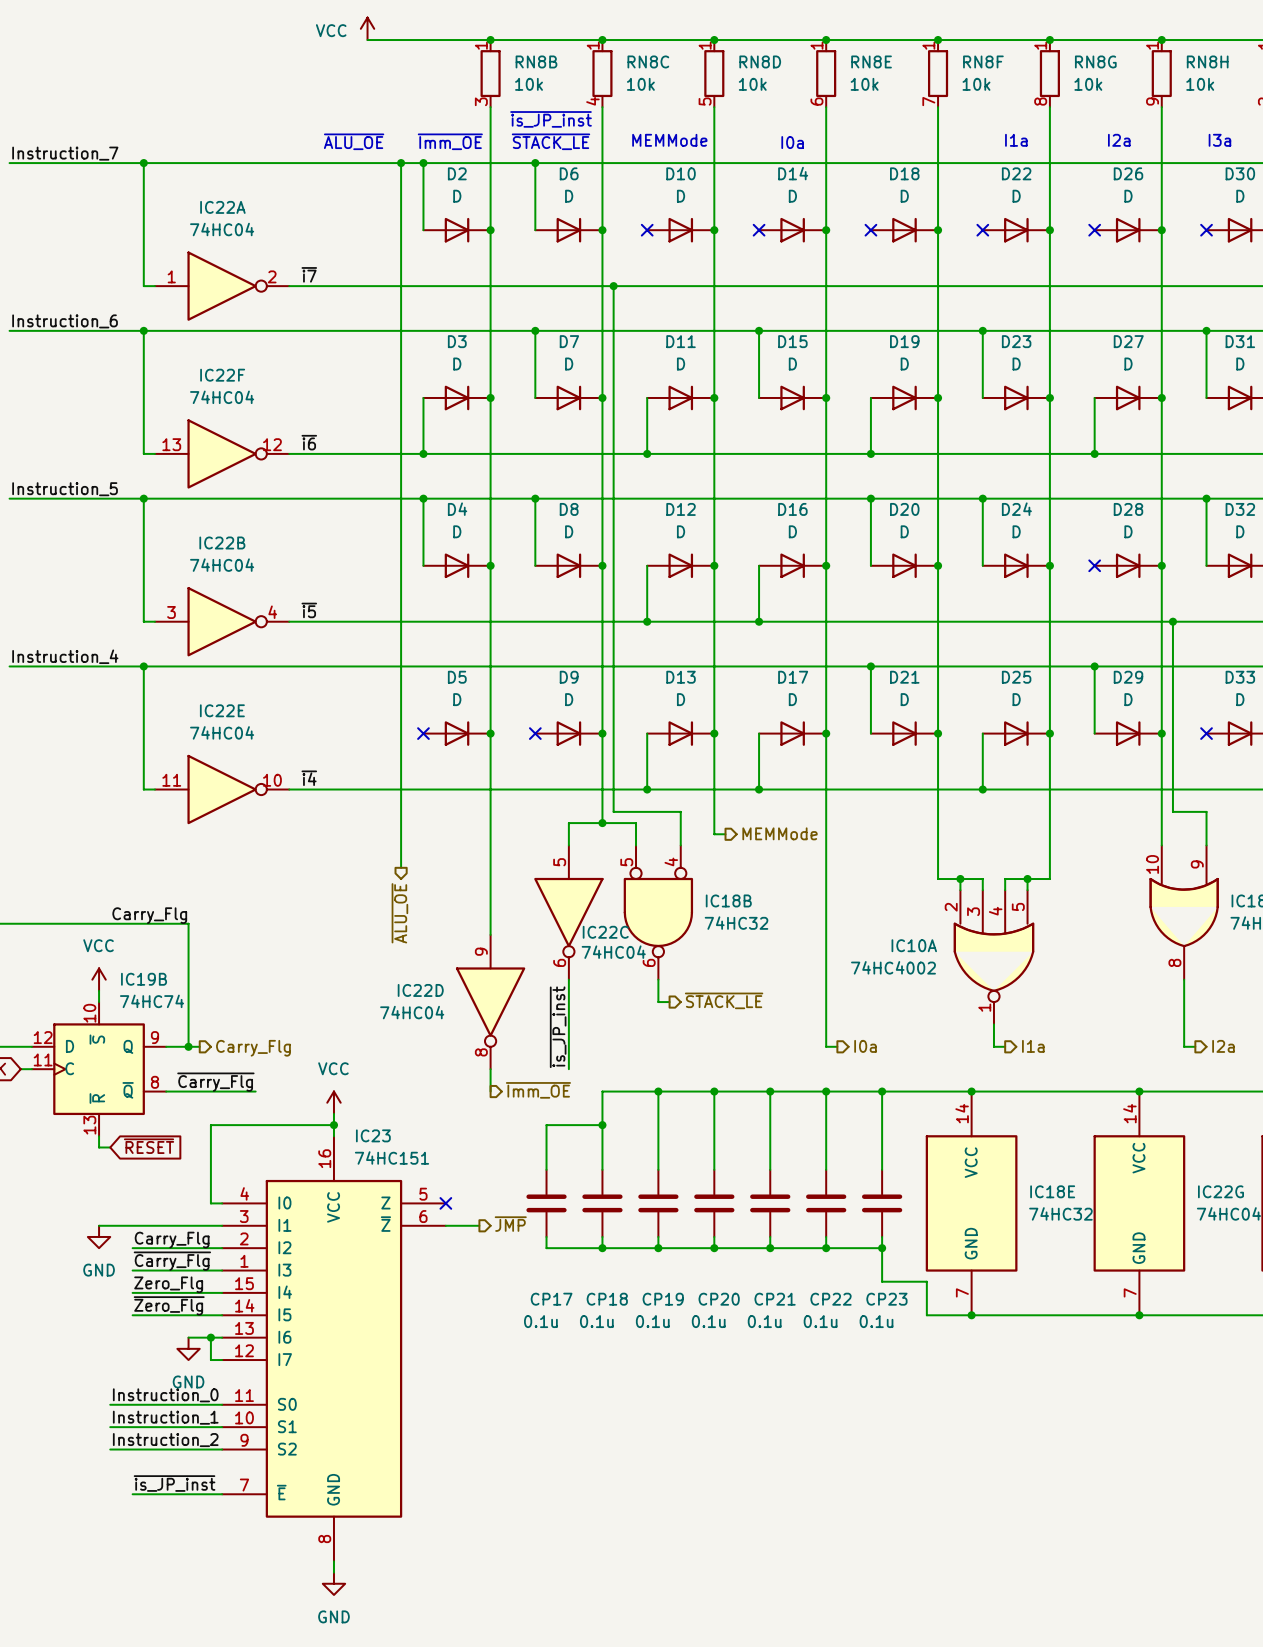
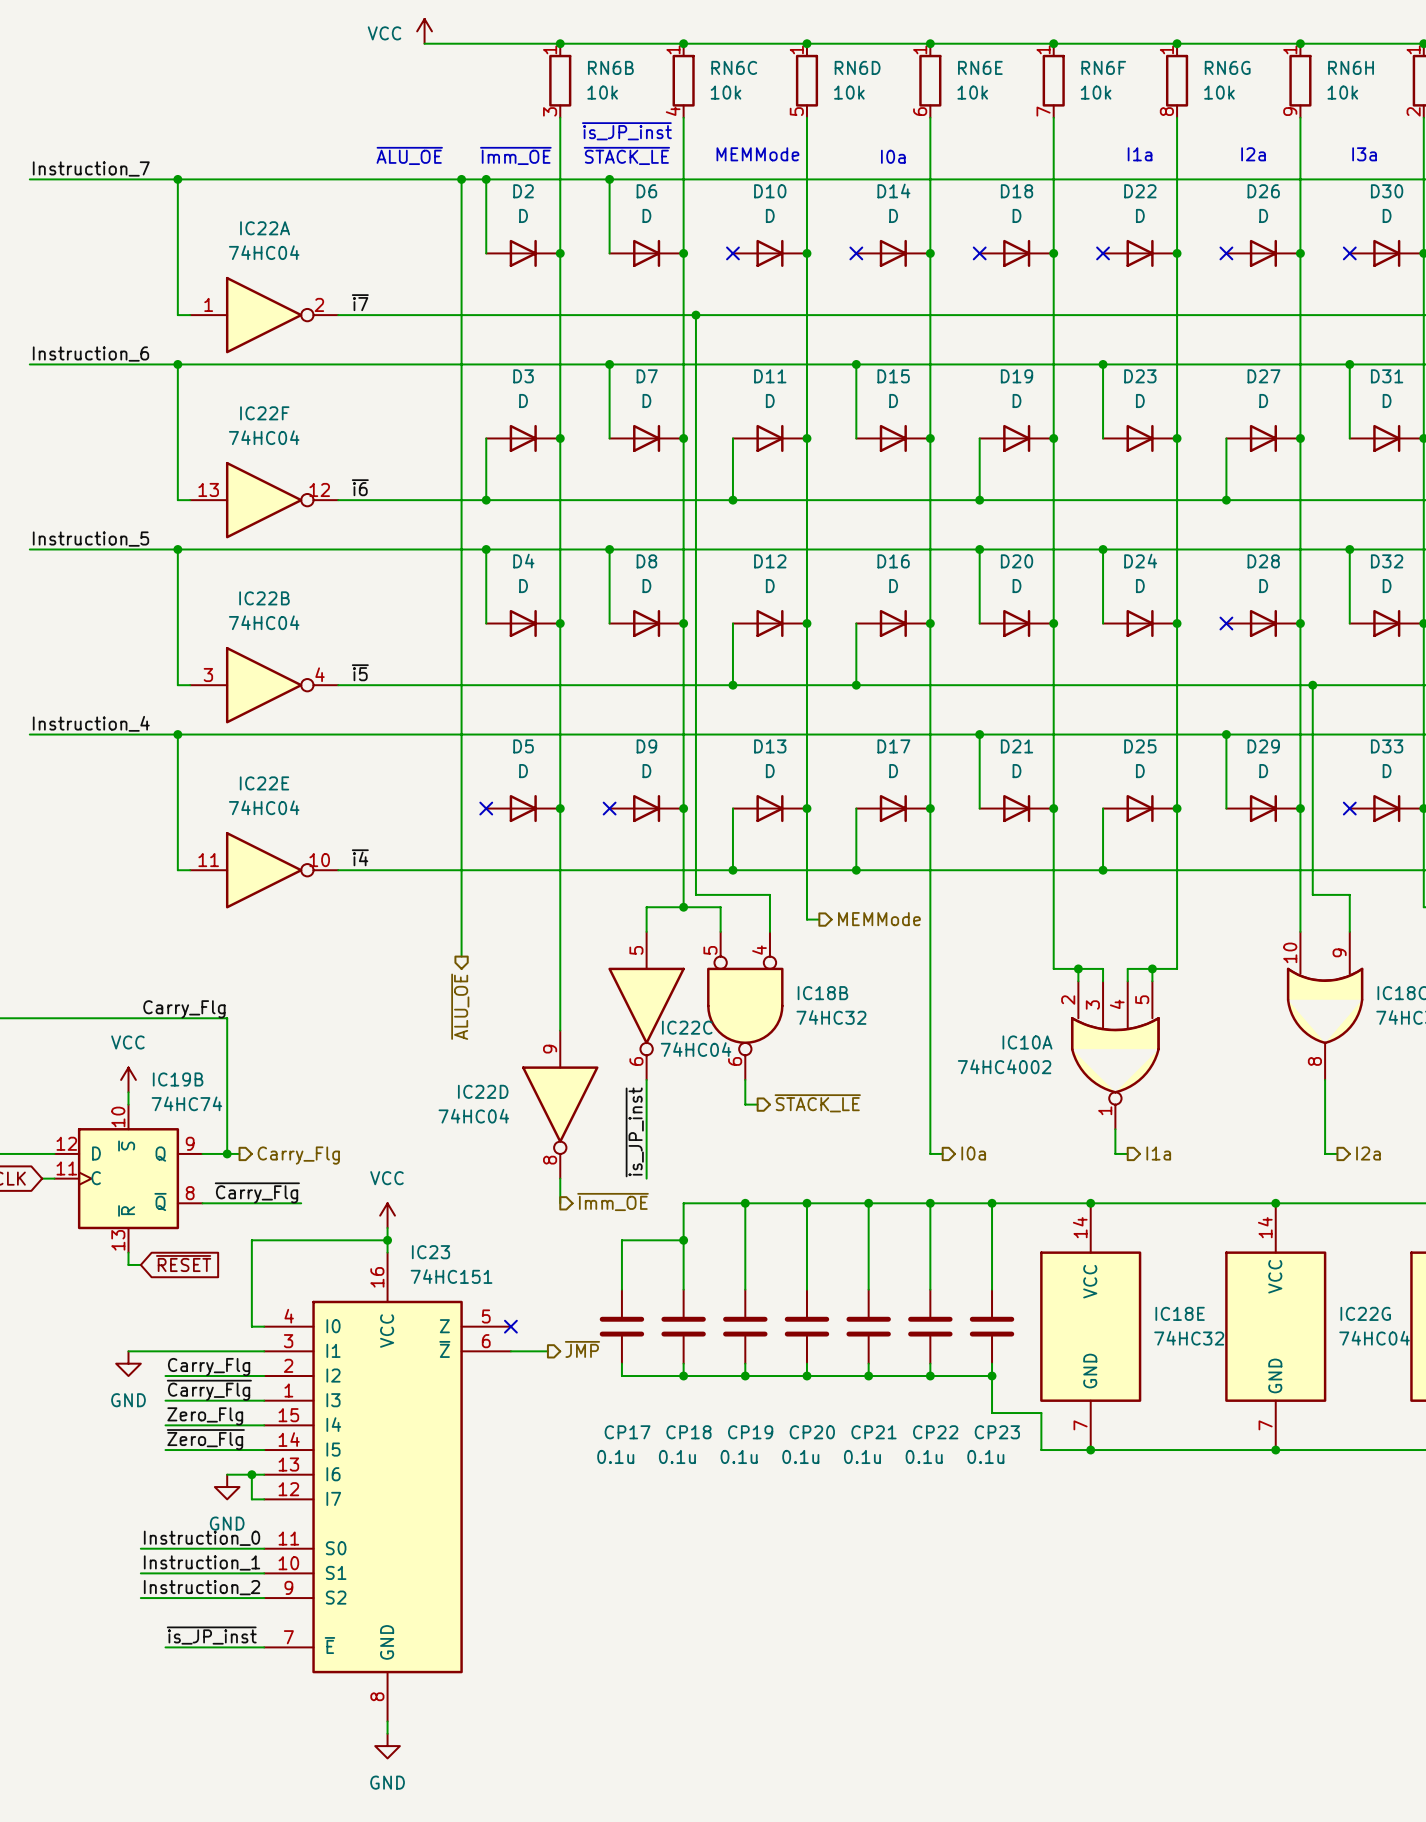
RN8B name: RN8B (536, 61) -> RN6B (610, 67)
RN8C name: RN8C (648, 61) -> RN6C (734, 67)
RN8D name: RN8D (760, 61) -> RN6D (857, 67)
RN8E name: RN8E (871, 61) -> RN6E (980, 67)
RN8F name: RN8F (983, 61) -> RN6F (1103, 67)
RN8G name: RN8G (1095, 61) -> RN6G (1227, 67)
RN8H name: RN8H (1207, 61) -> RN6H (1351, 67)

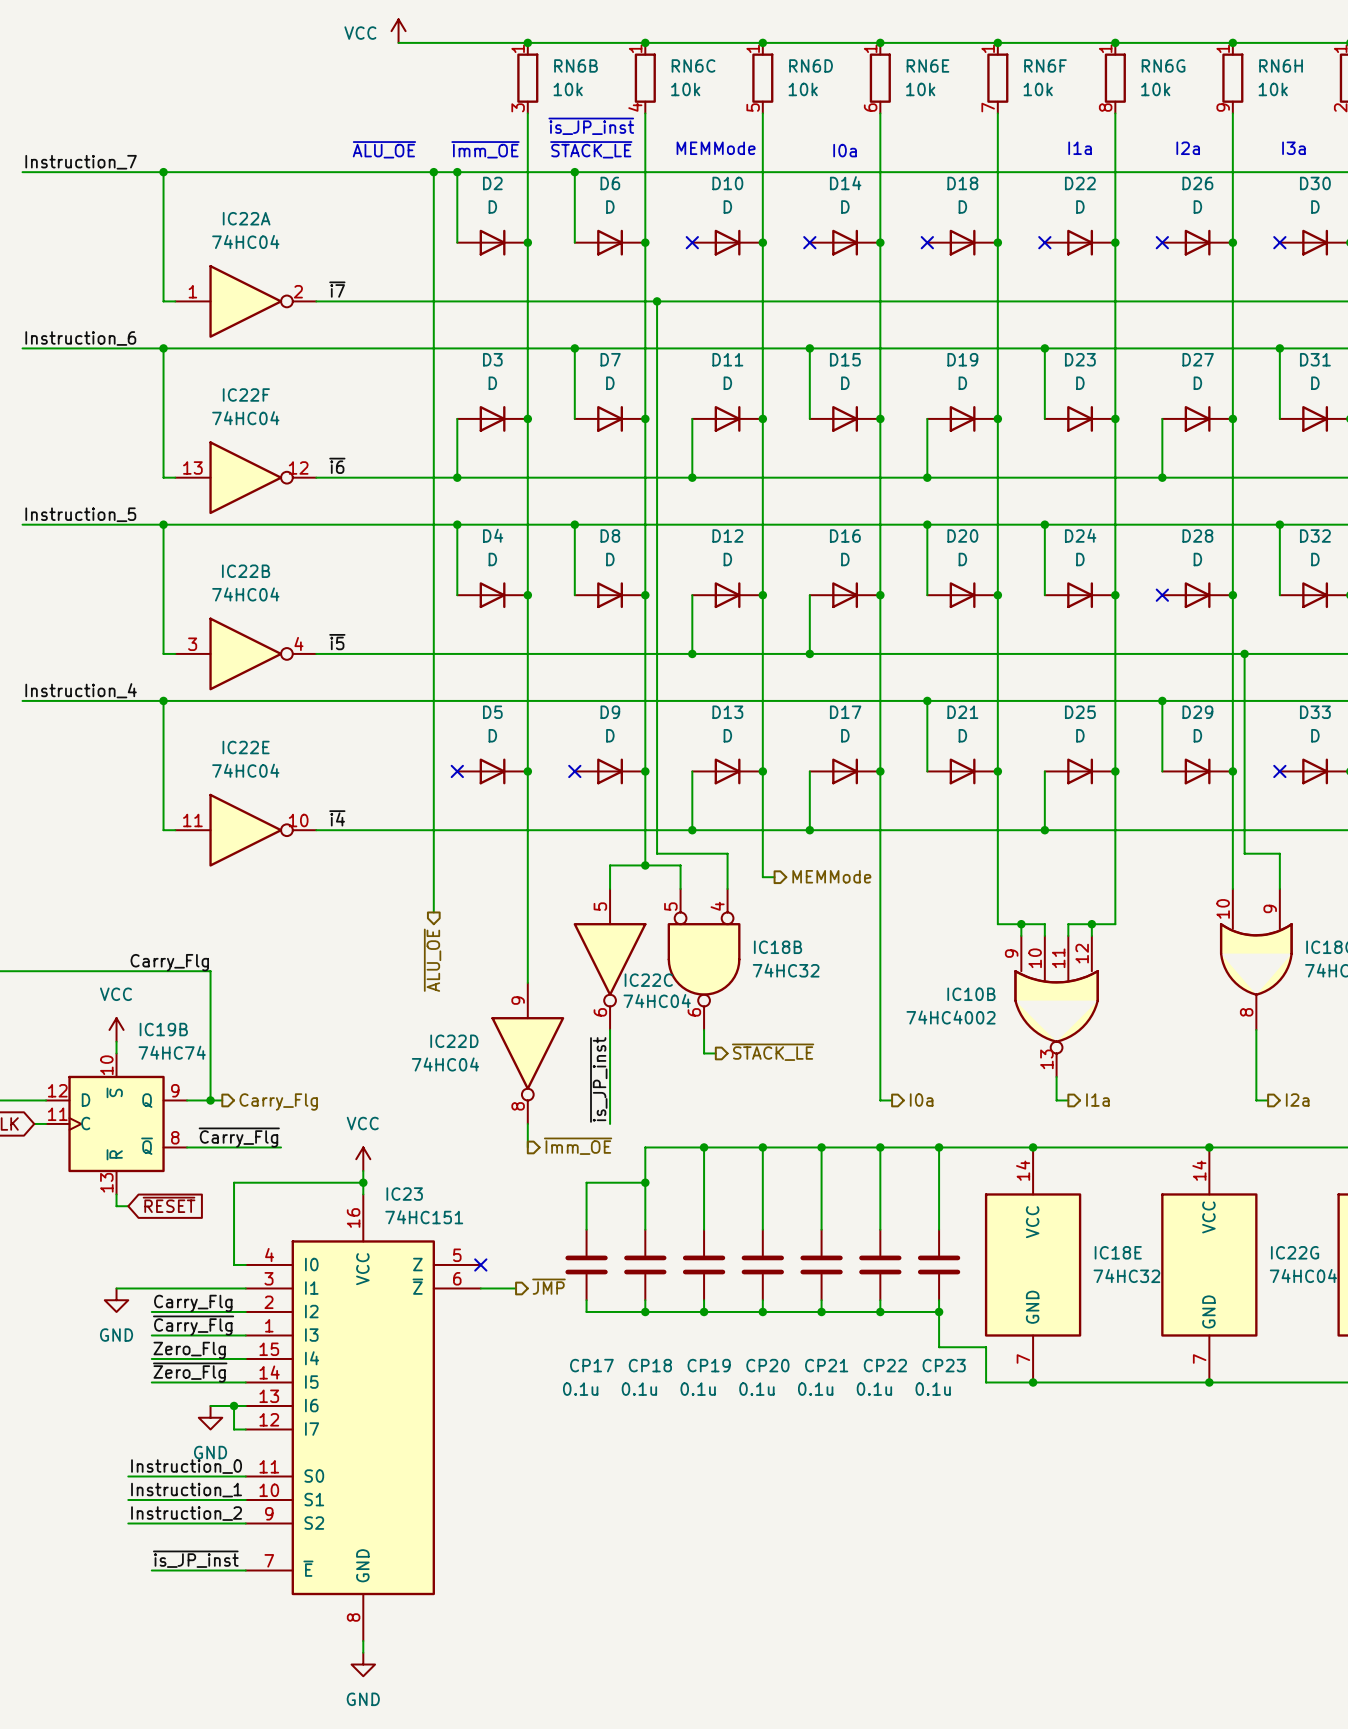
IC10A pin number: 5 (1142, 999) -> 12 (1082, 953)
IC10A pin number: 2 (1068, 1000) -> 9 (1011, 953)
IC10A pin number: 3 (1092, 1004) -> 10 (1035, 958)
IC10A pin number: 4 (1117, 1004) -> 11 (1058, 958)
IC10A name: IC10A (1027, 1042) -> IC10B (971, 994)
IC10A pin number: 1 (1105, 1110) -> 13 (1046, 1059)

